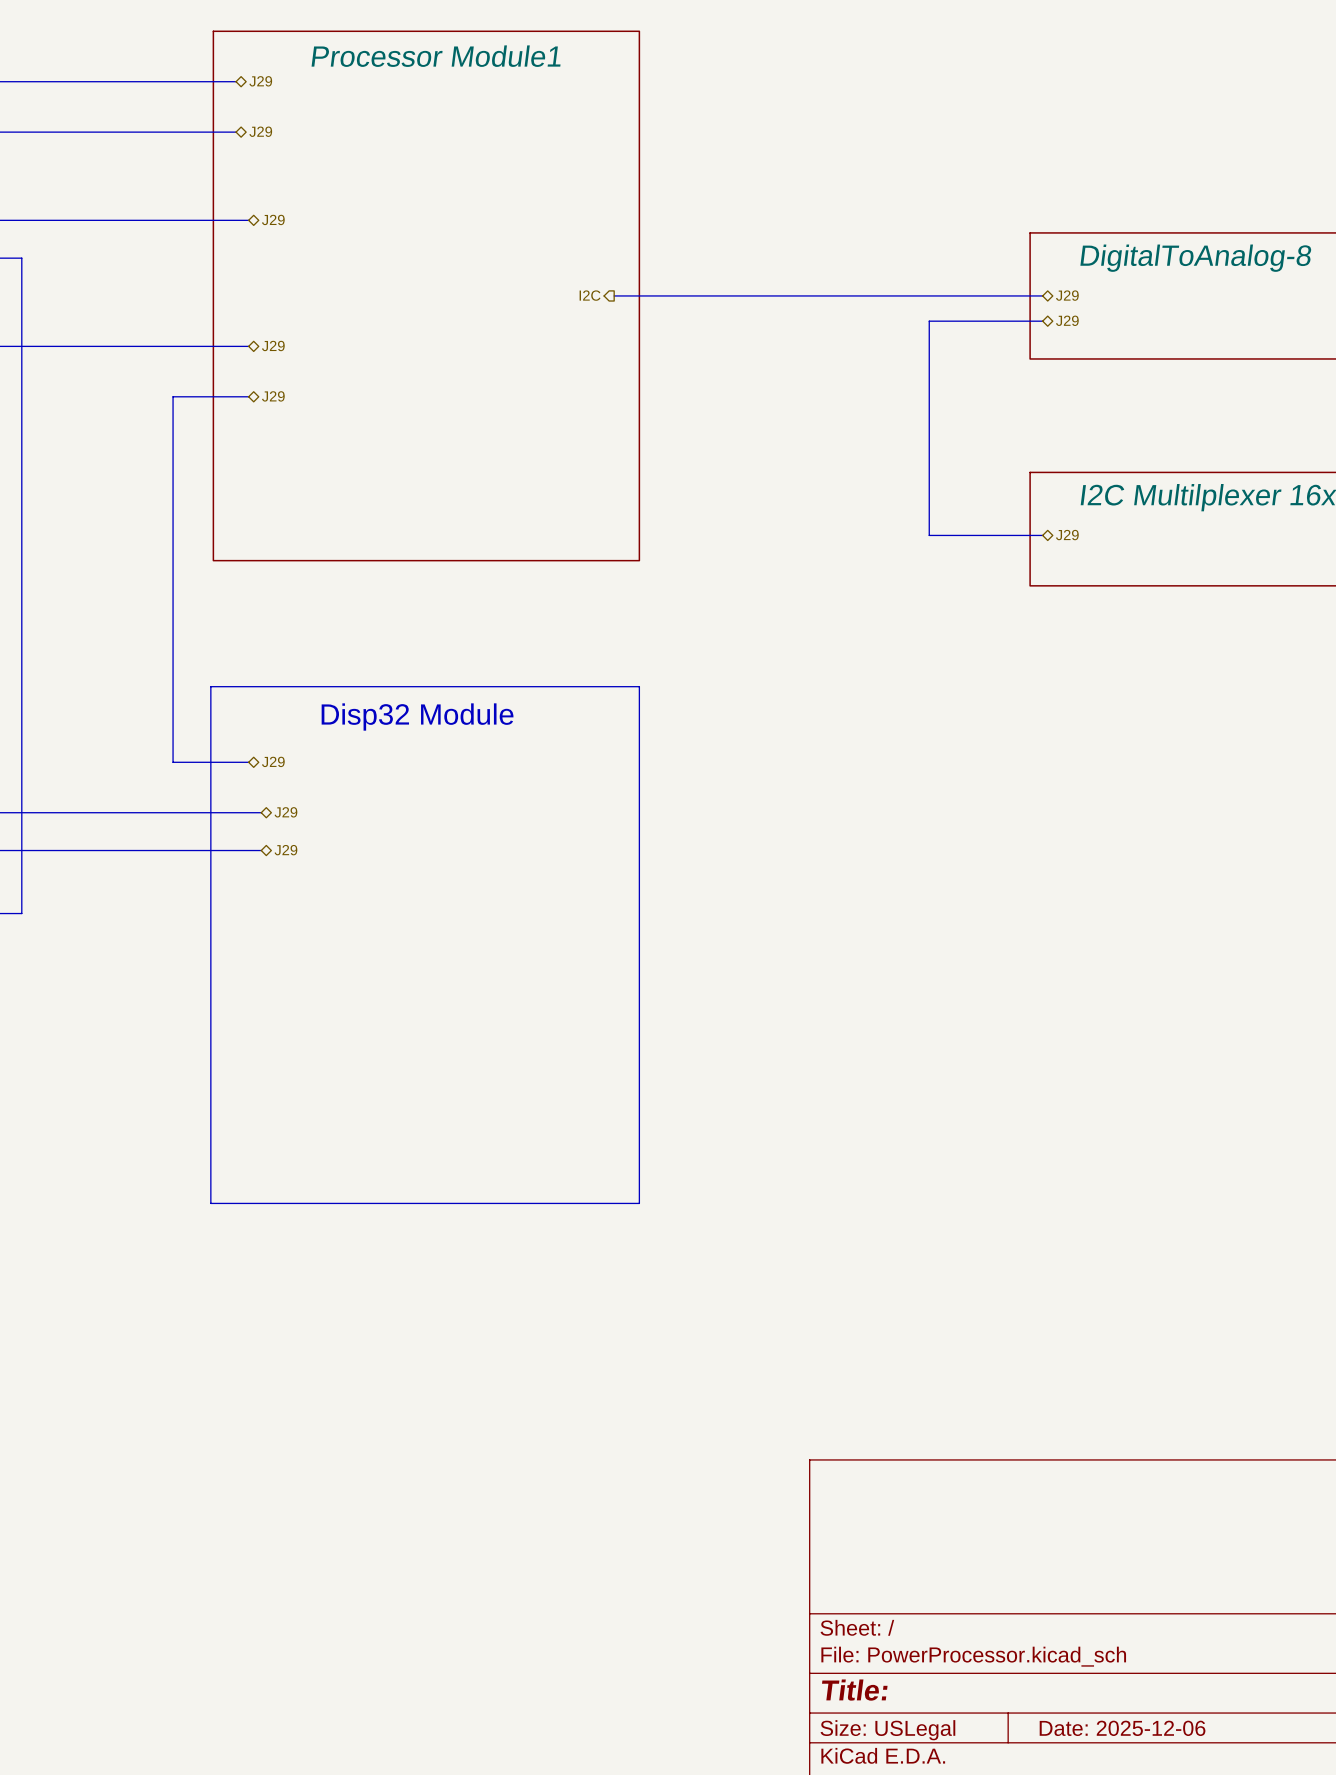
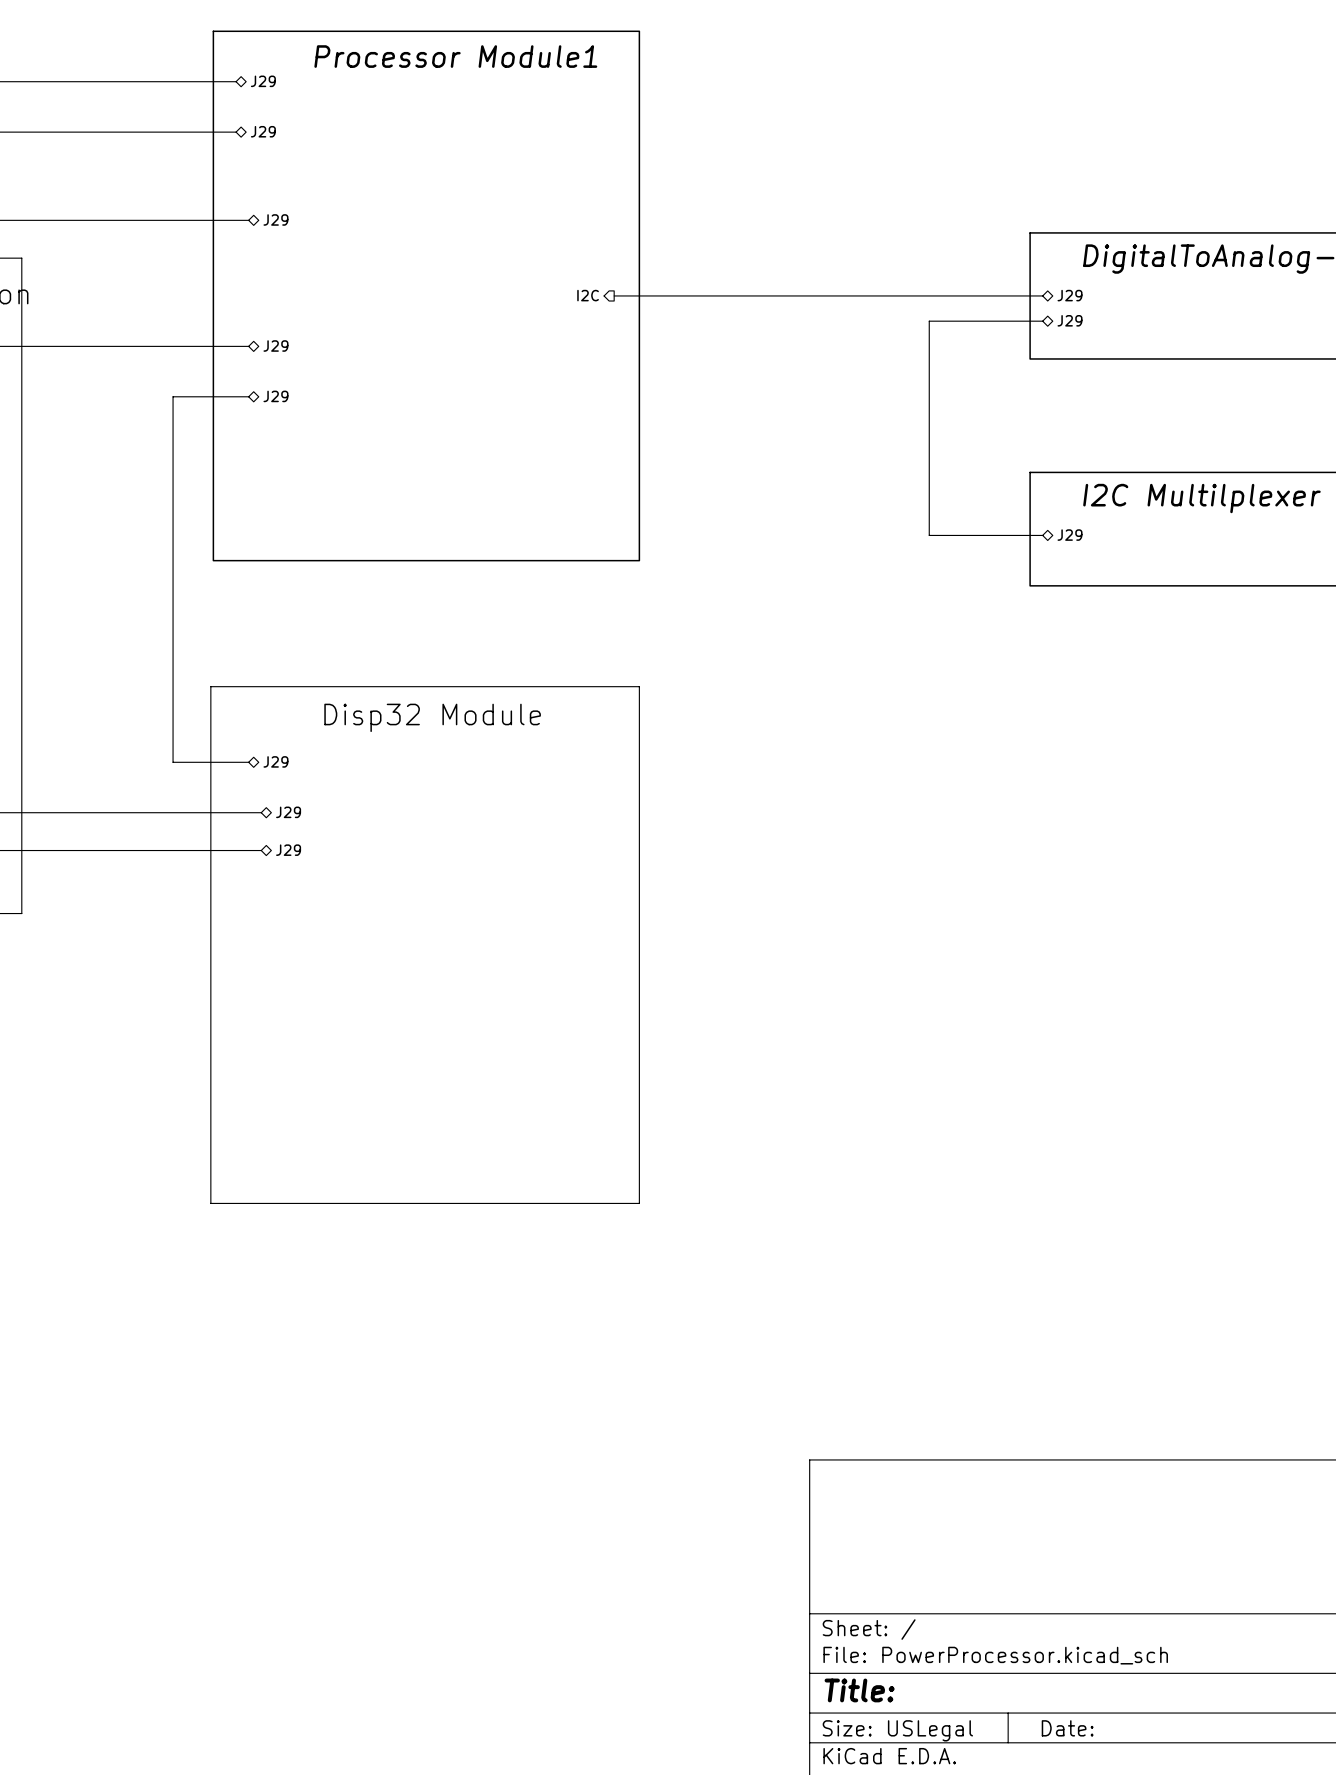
title block: Date: 2025-12-06 (1122, 1728) -> Date: (1067, 1728)

